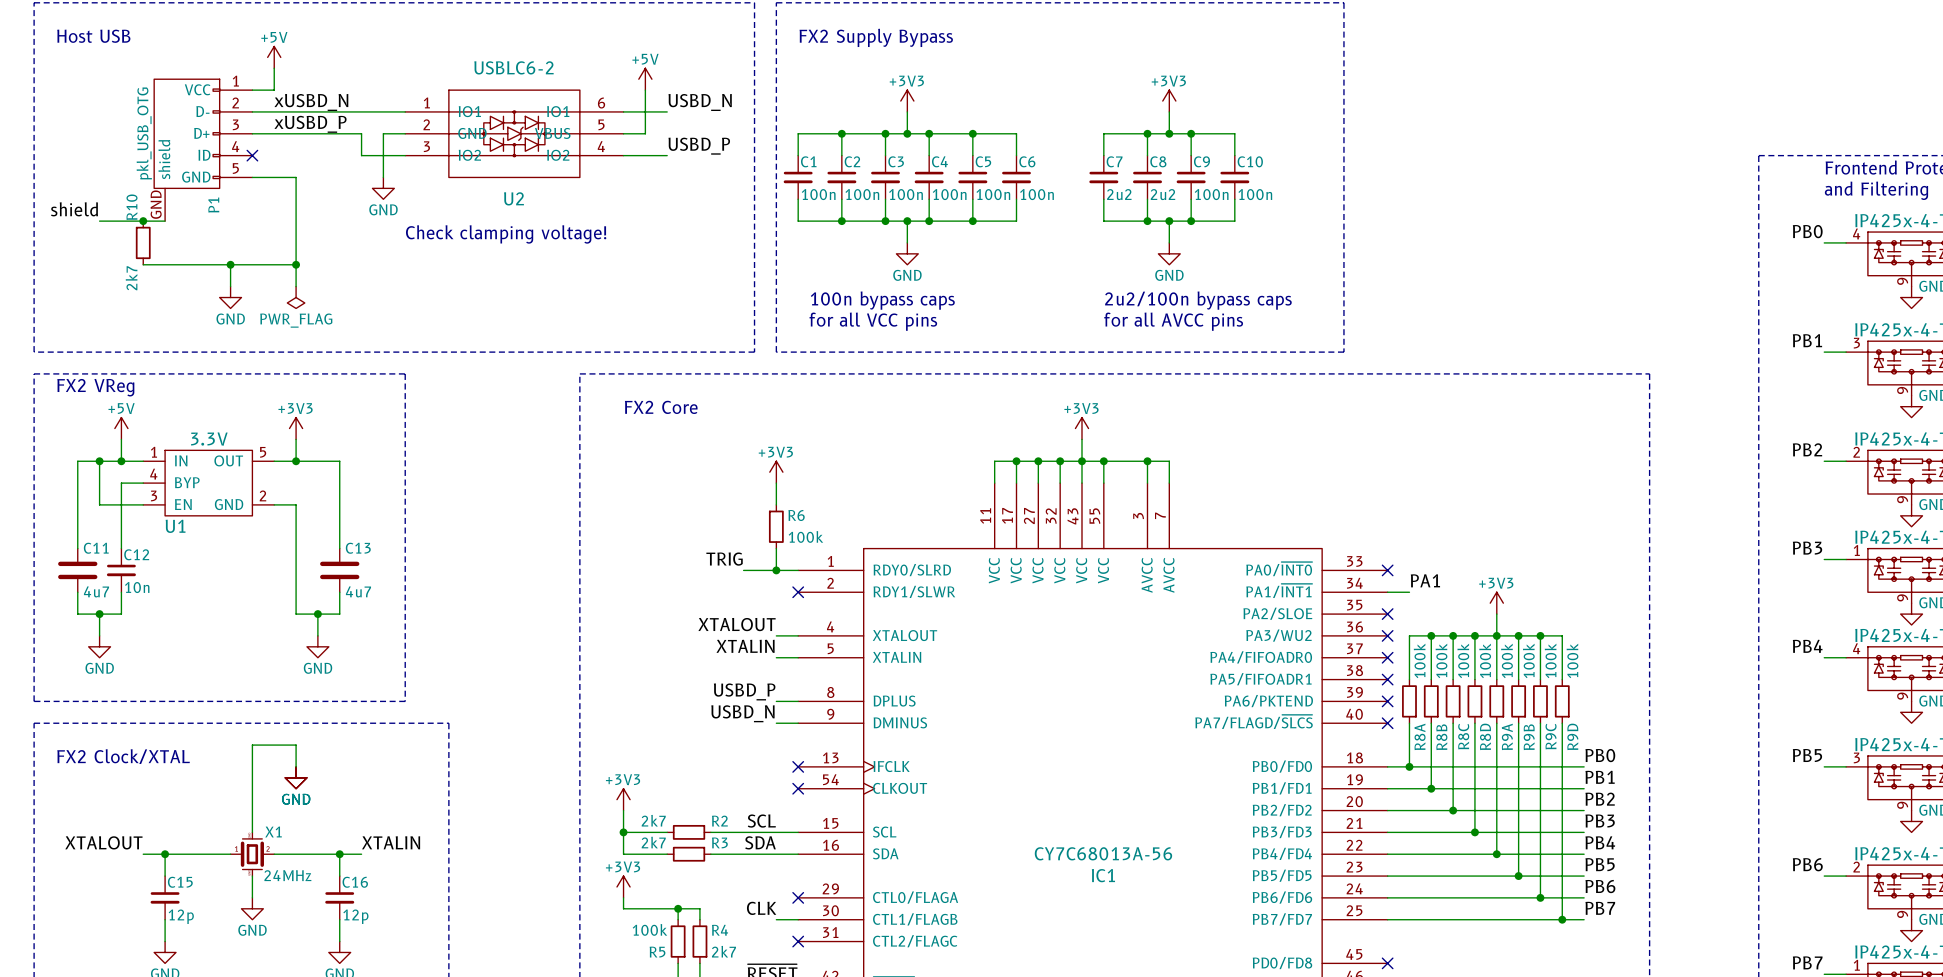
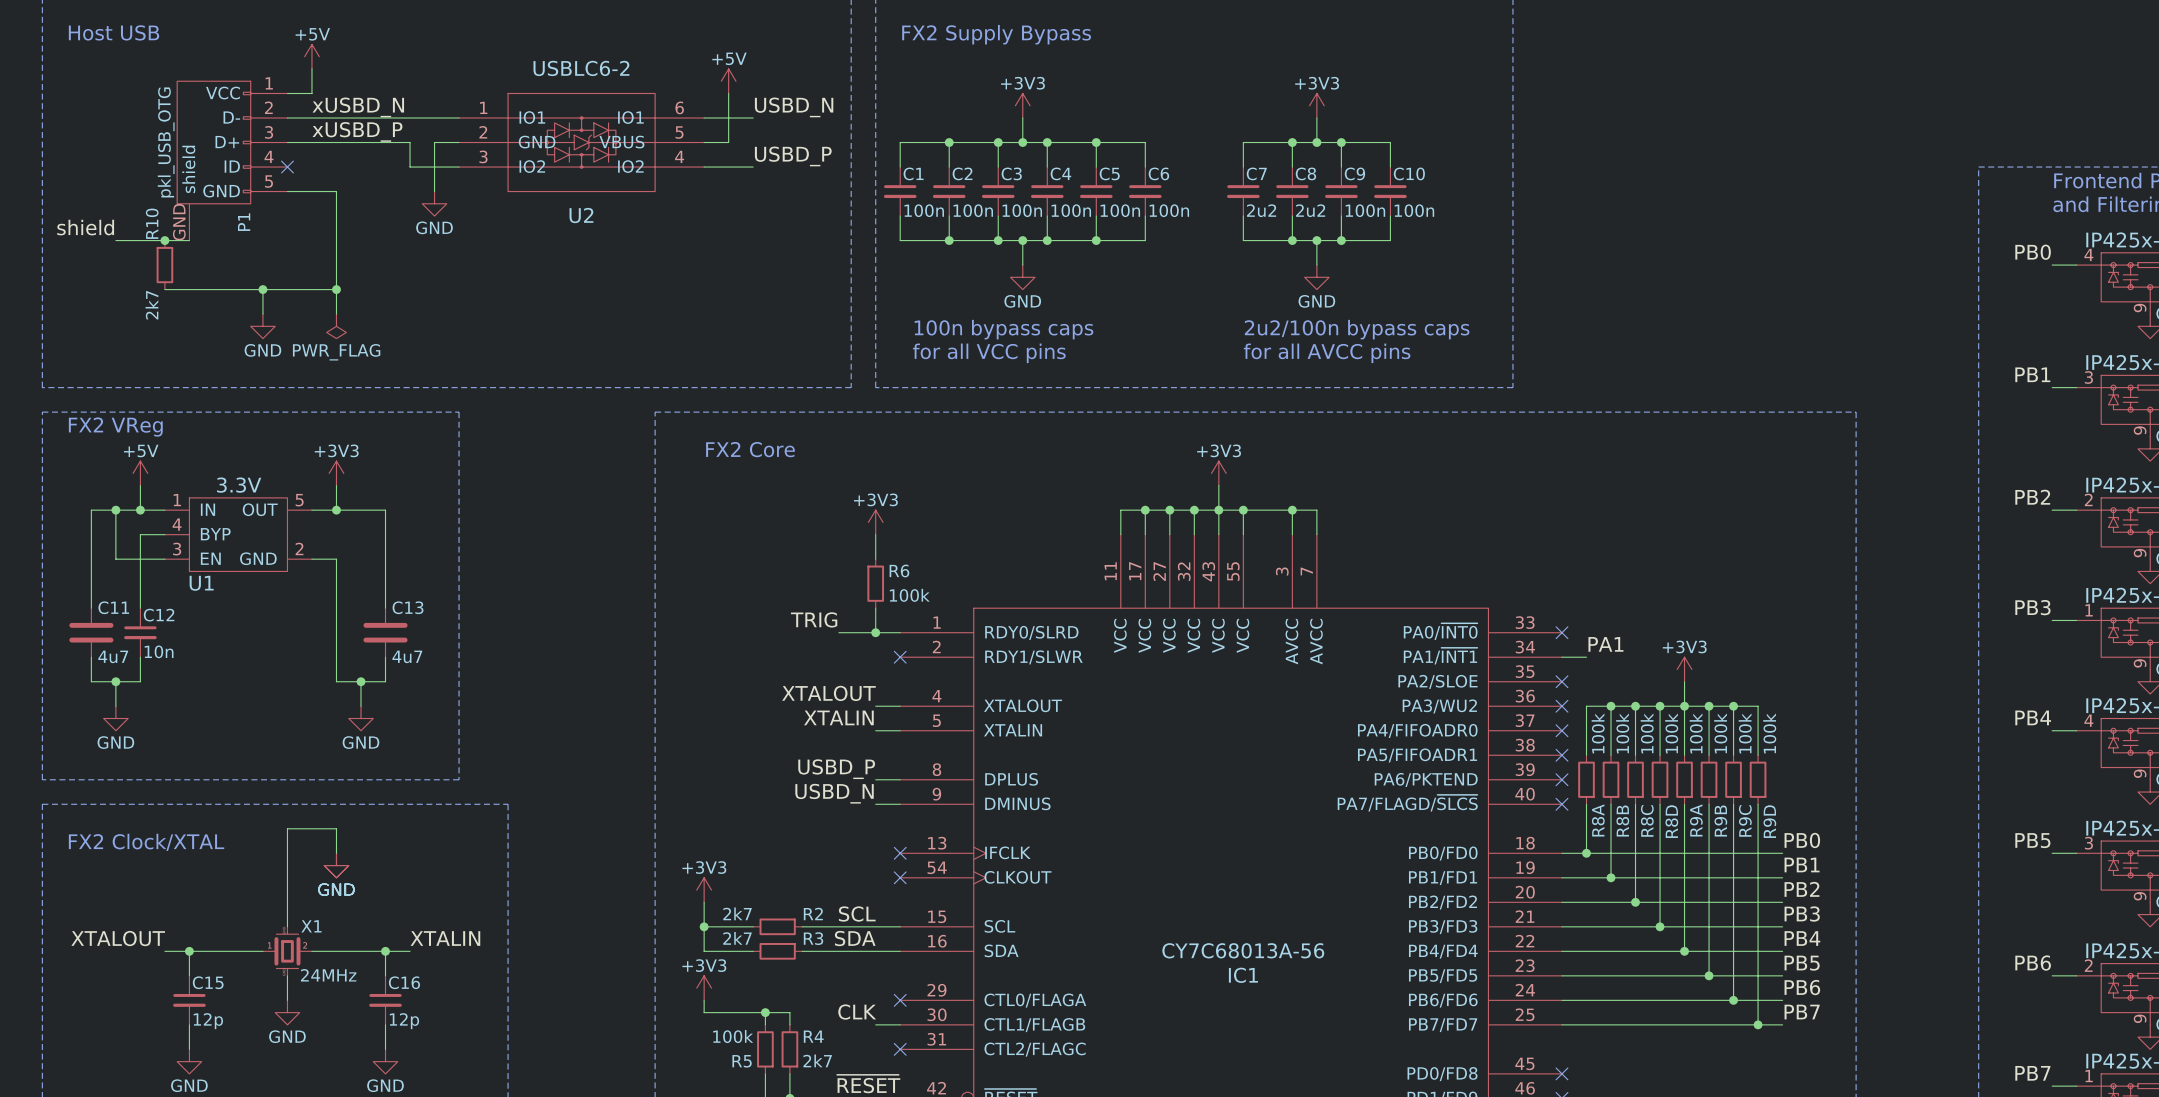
text: Check clamping voltage! (506, 234) -> none

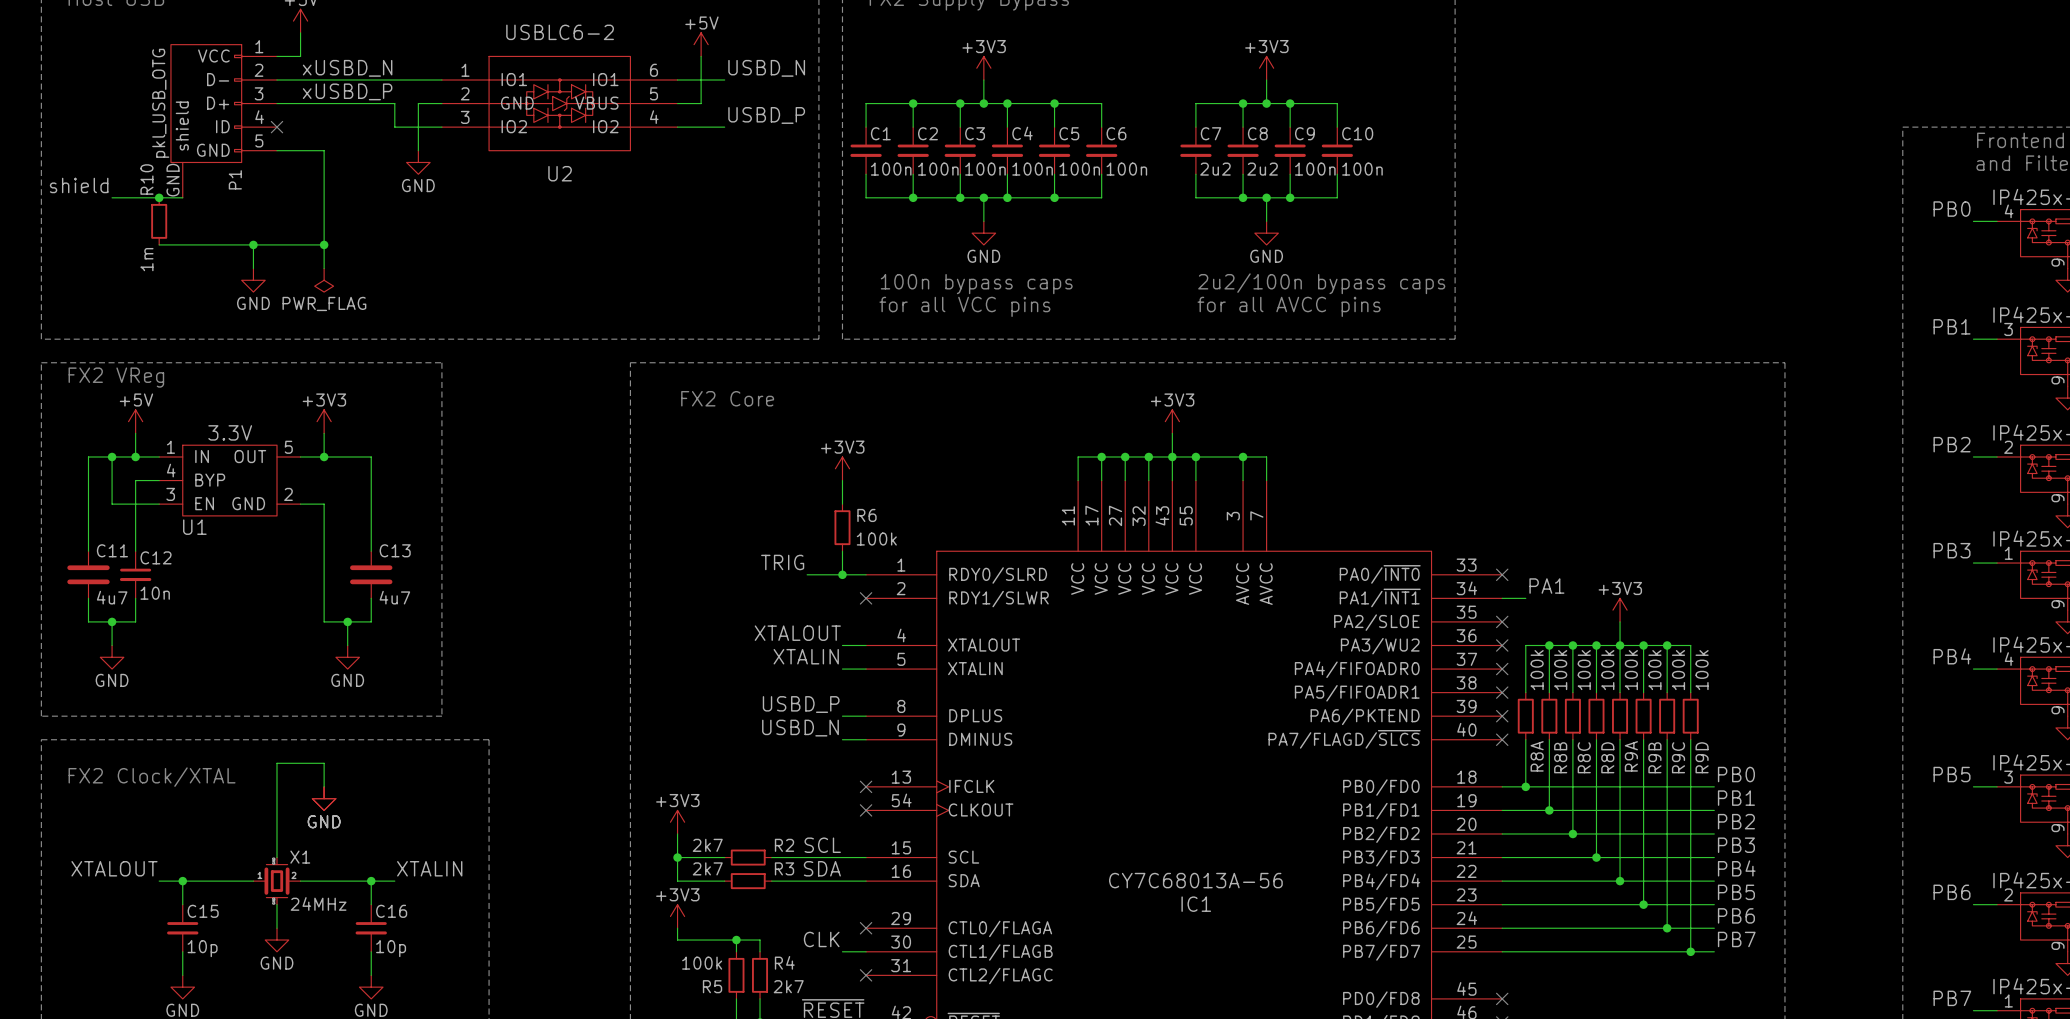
R10 value: 2k7 (151, 305) -> 1m (146, 259)
C15 value: 12p (208, 1021) -> 10p (202, 948)
C16 value: 12p (404, 1021) -> 10p (391, 948)

